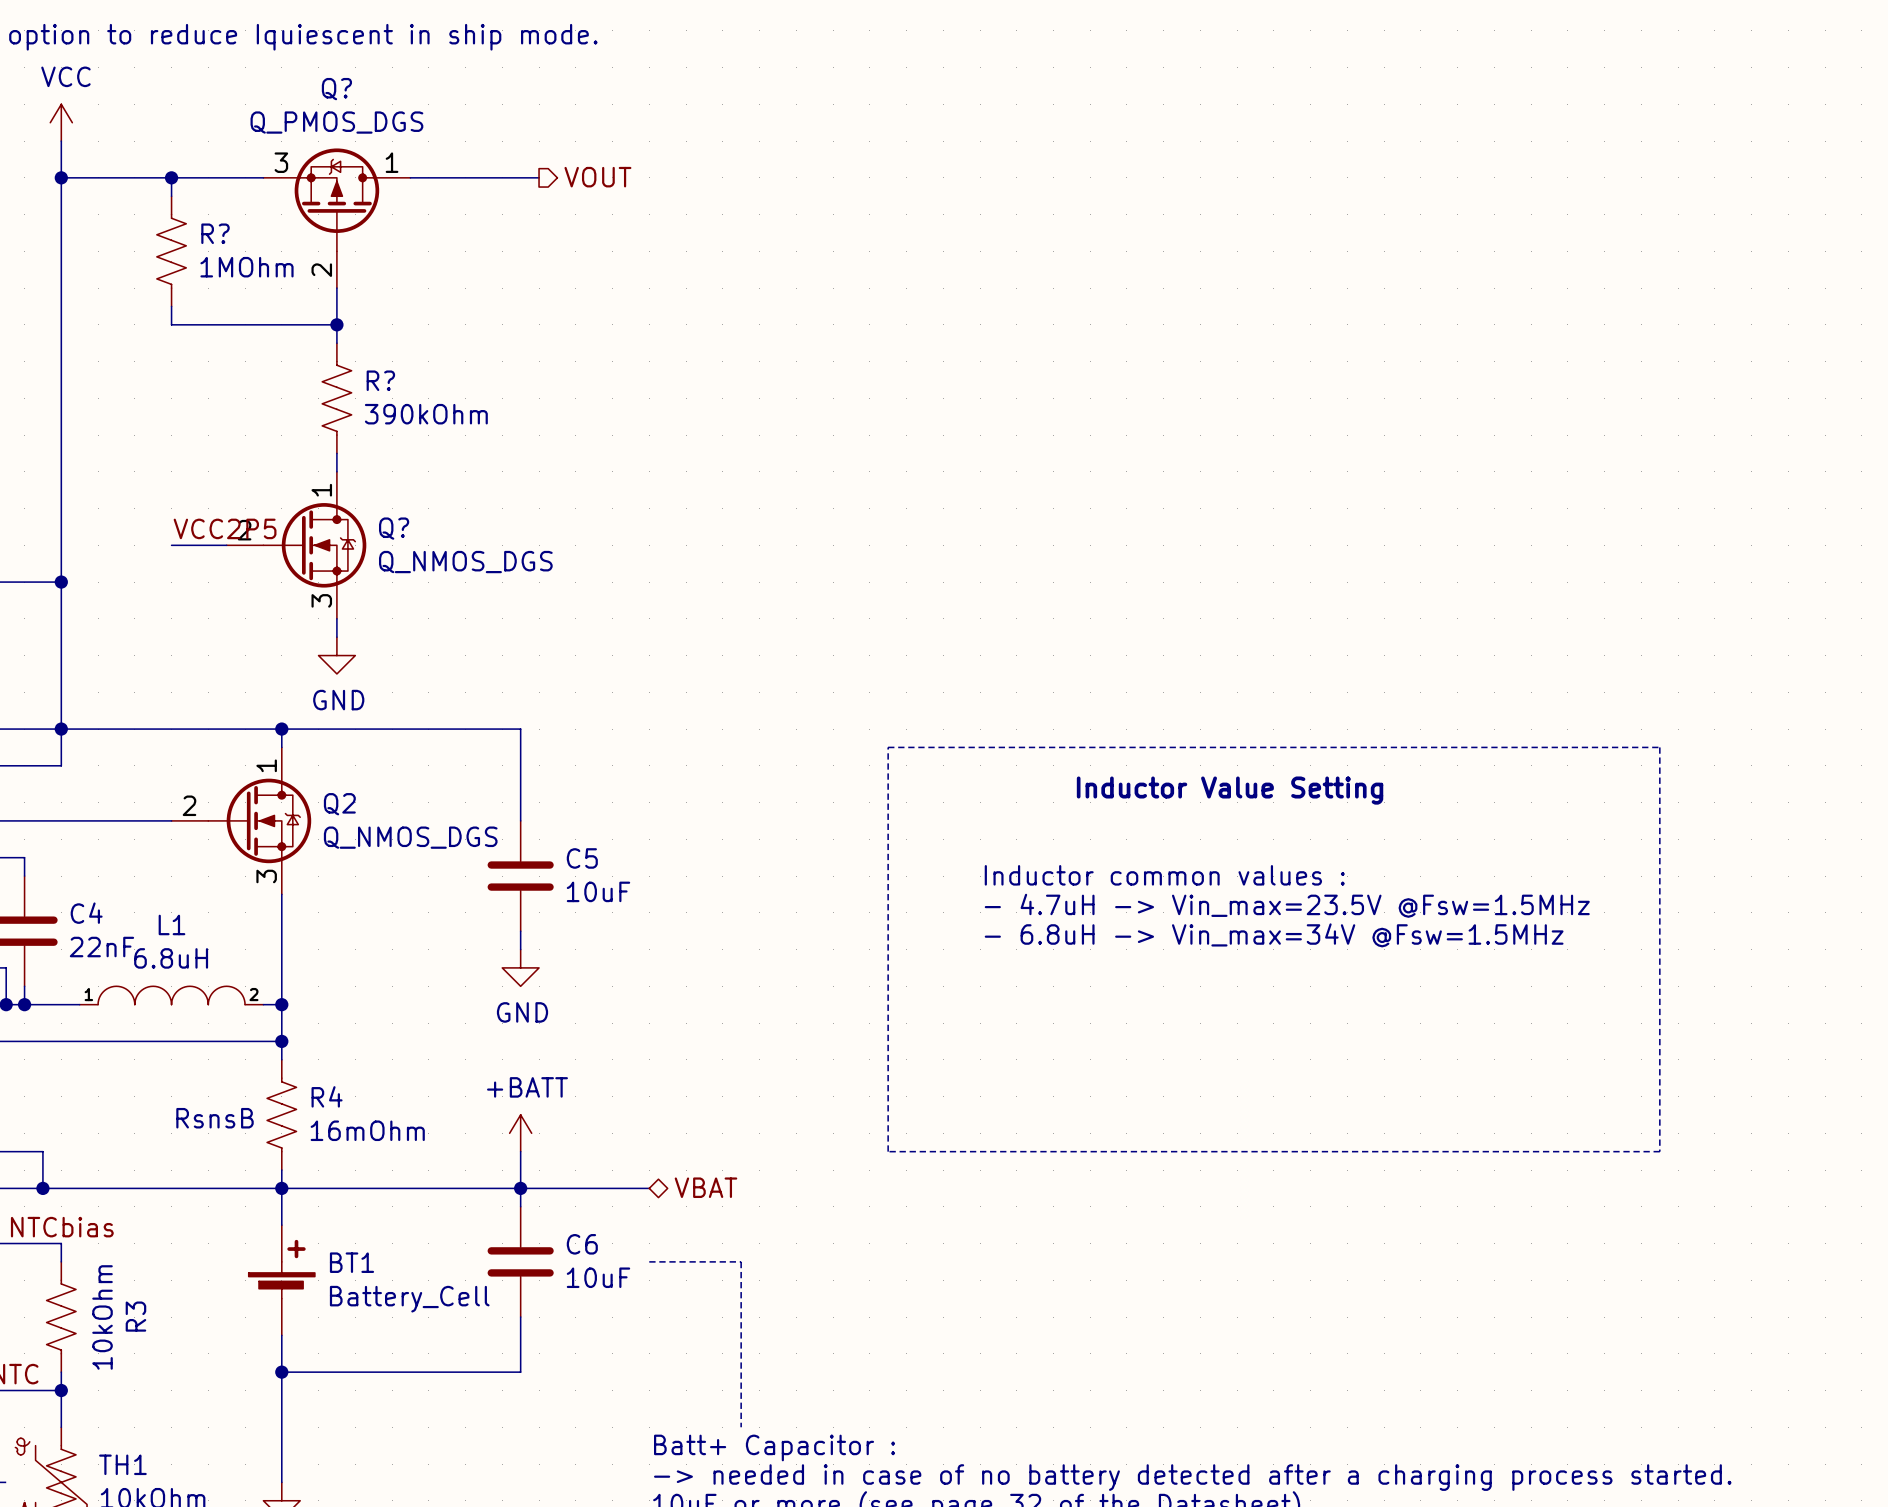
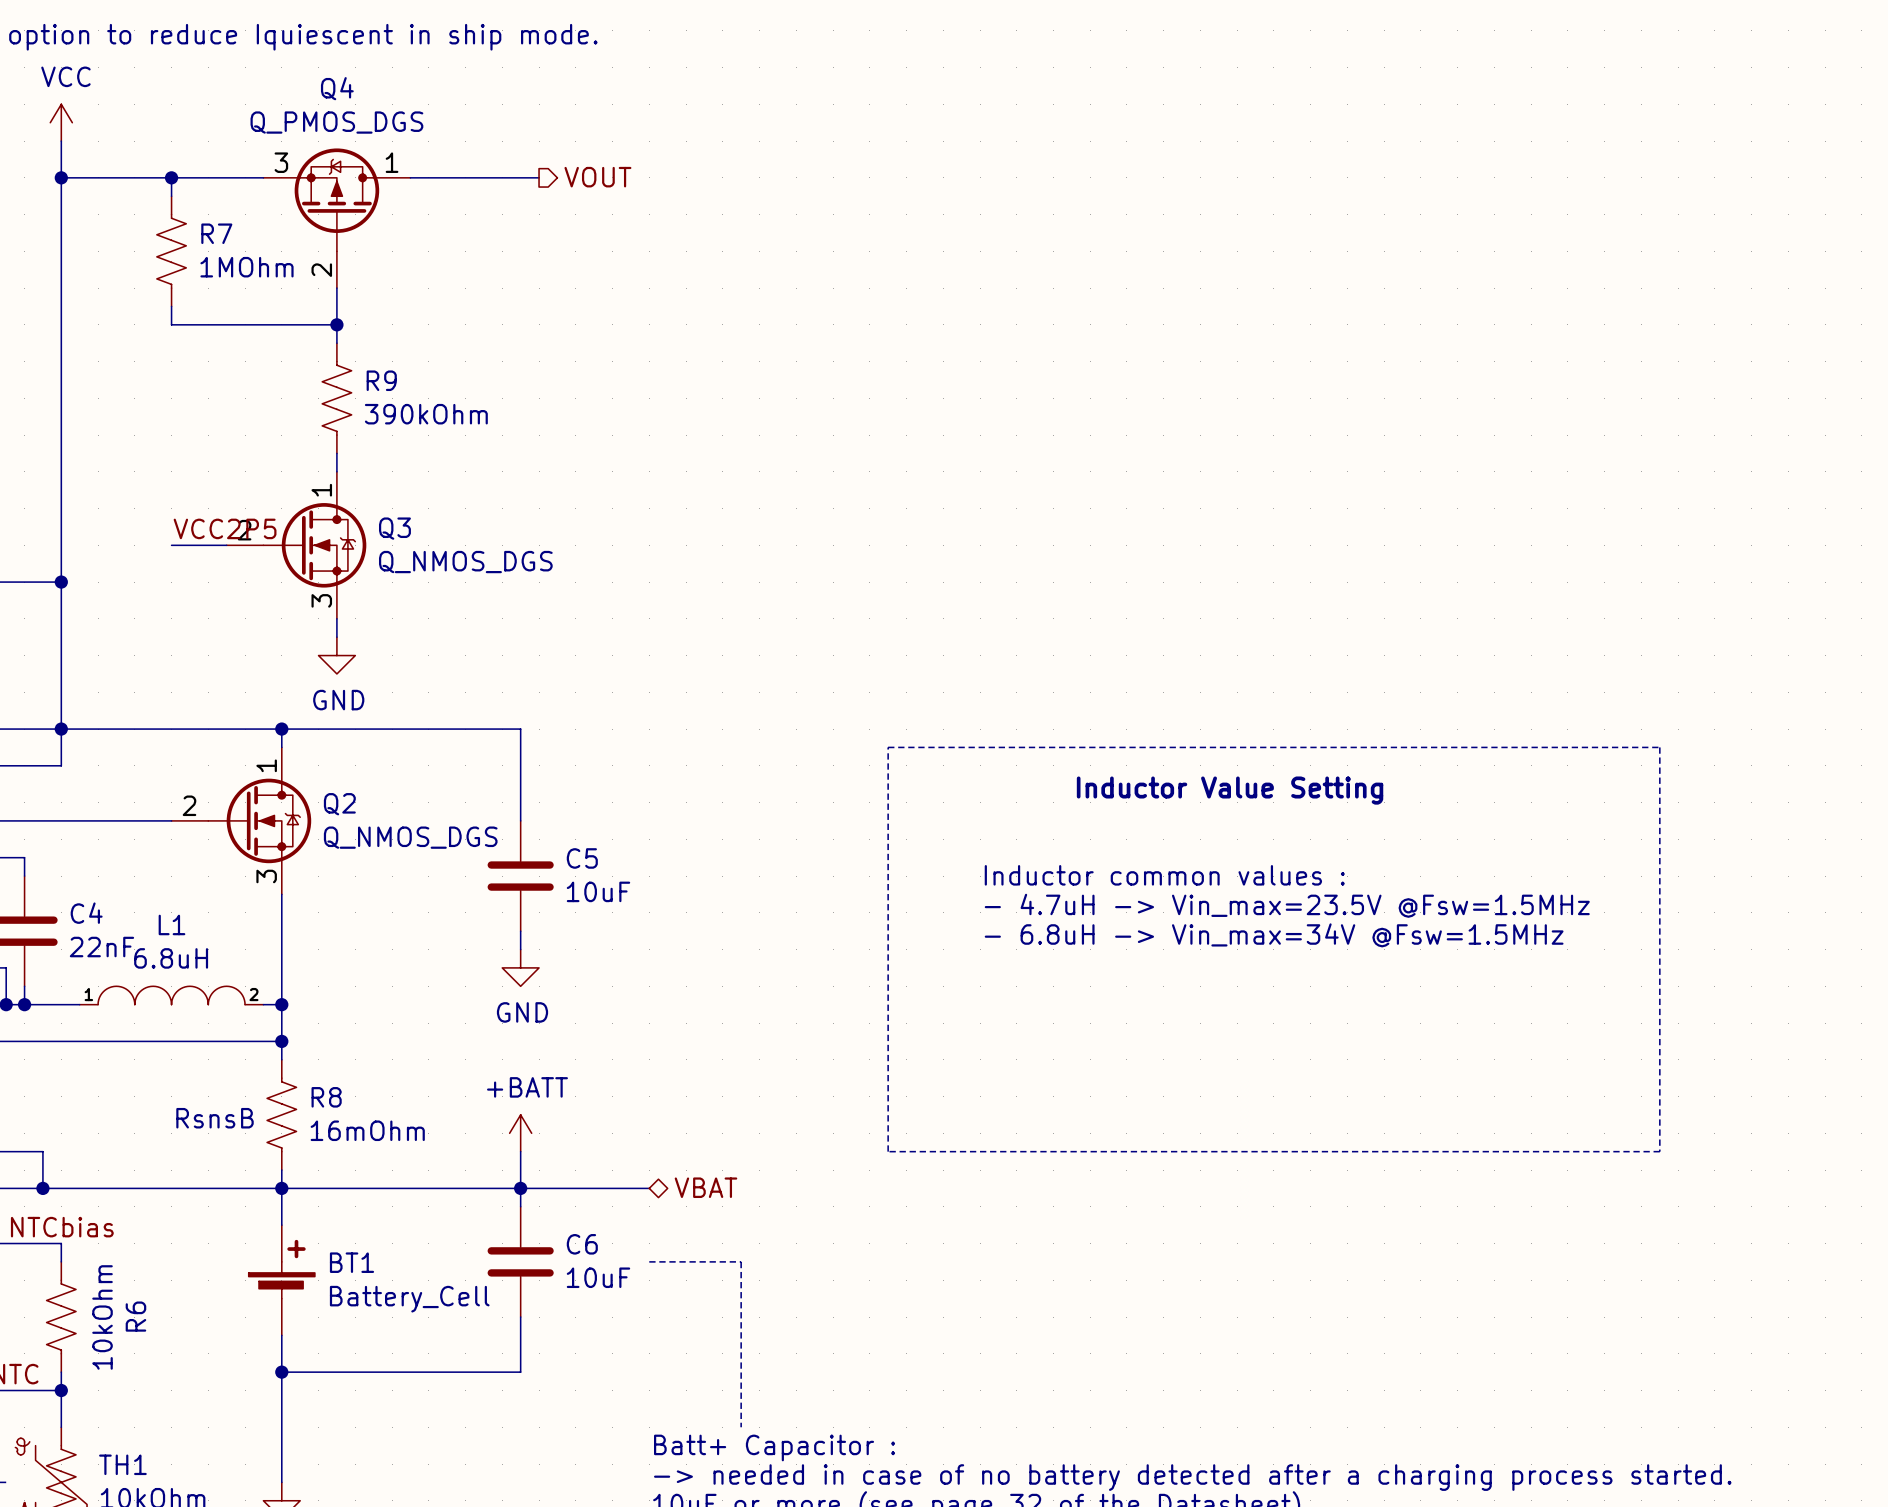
Q? name: Q? (336, 89) -> Q4 (337, 88)
R? name: R? (215, 233) -> R7 (216, 233)
R? name: R? (380, 380) -> R9 (381, 380)
Q? name: Q? (394, 528) -> Q3 (394, 528)
R4 name: R4 (327, 1096) -> R8 (326, 1097)
R3 name: R3 (135, 1316) -> R6 (135, 1316)

